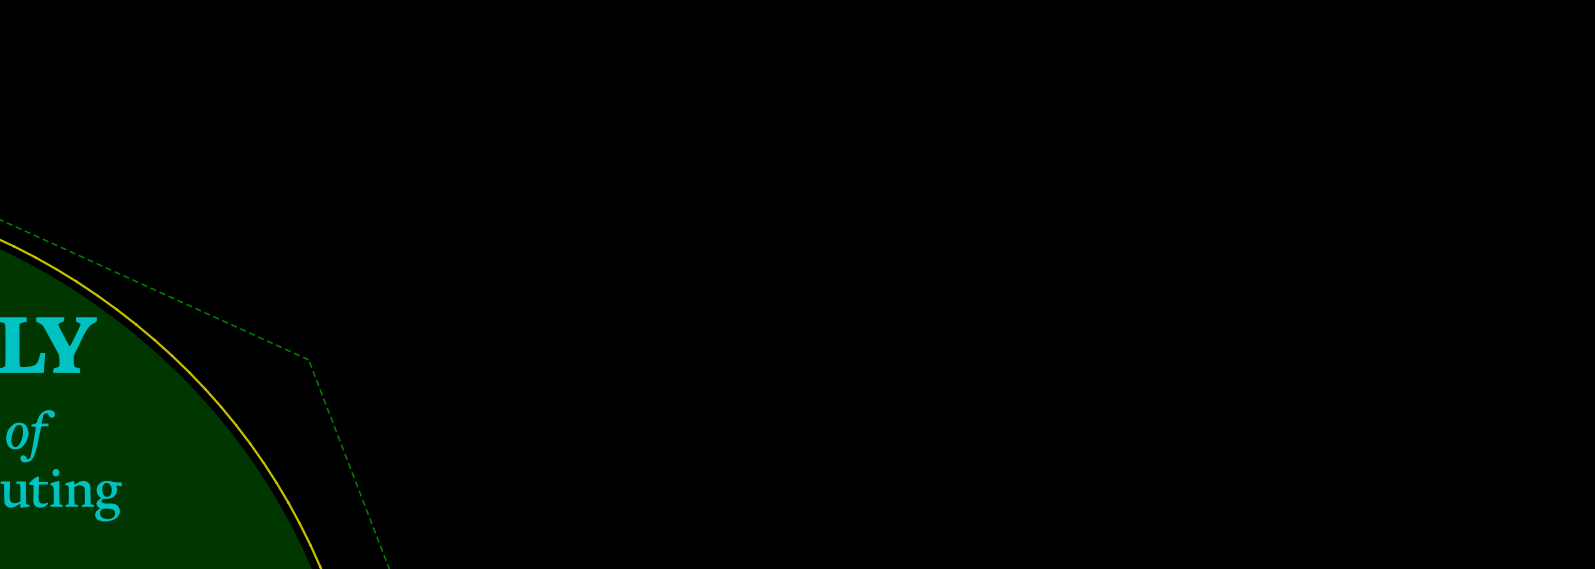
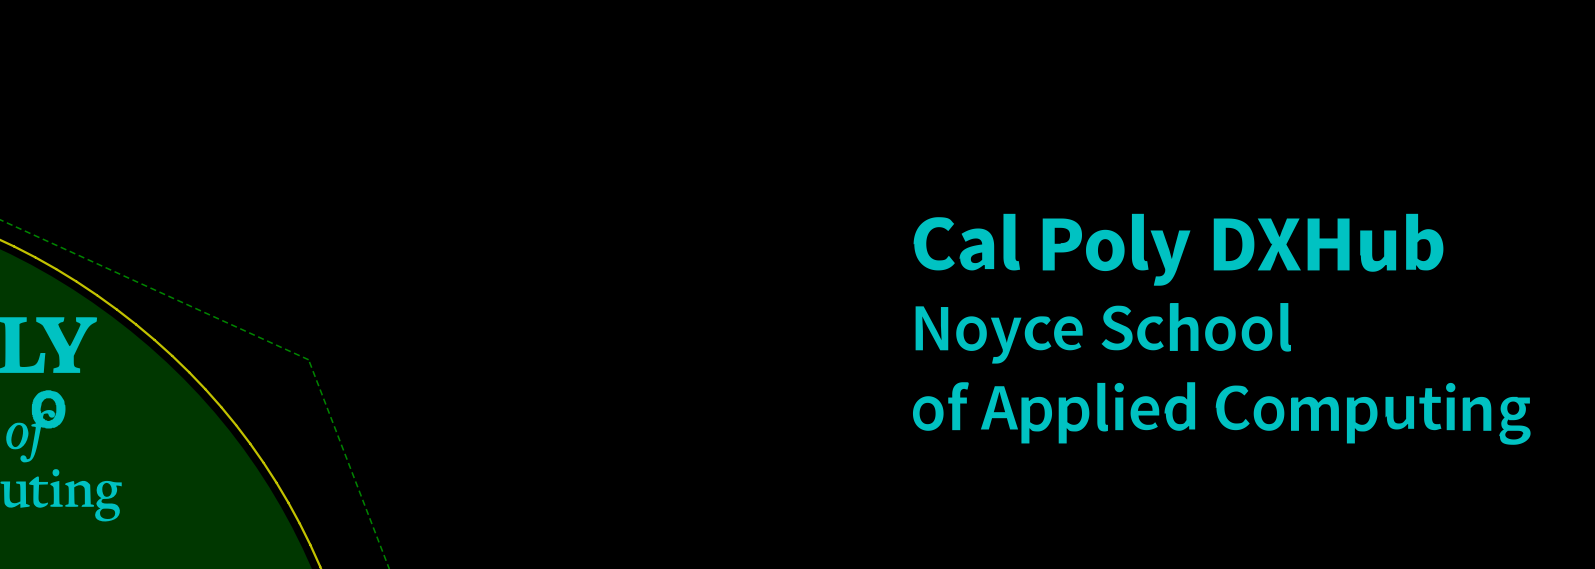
drawing: none -> [913, 213, 1021, 271]
drawing: none -> [915, 213, 1291, 364]
drawing: none -> [1213, 213, 1444, 272]
drawing: none -> [912, 382, 1196, 444]
drawing: none -> [1215, 382, 1531, 445]
drawing: none -> [31, 390, 66, 429]

